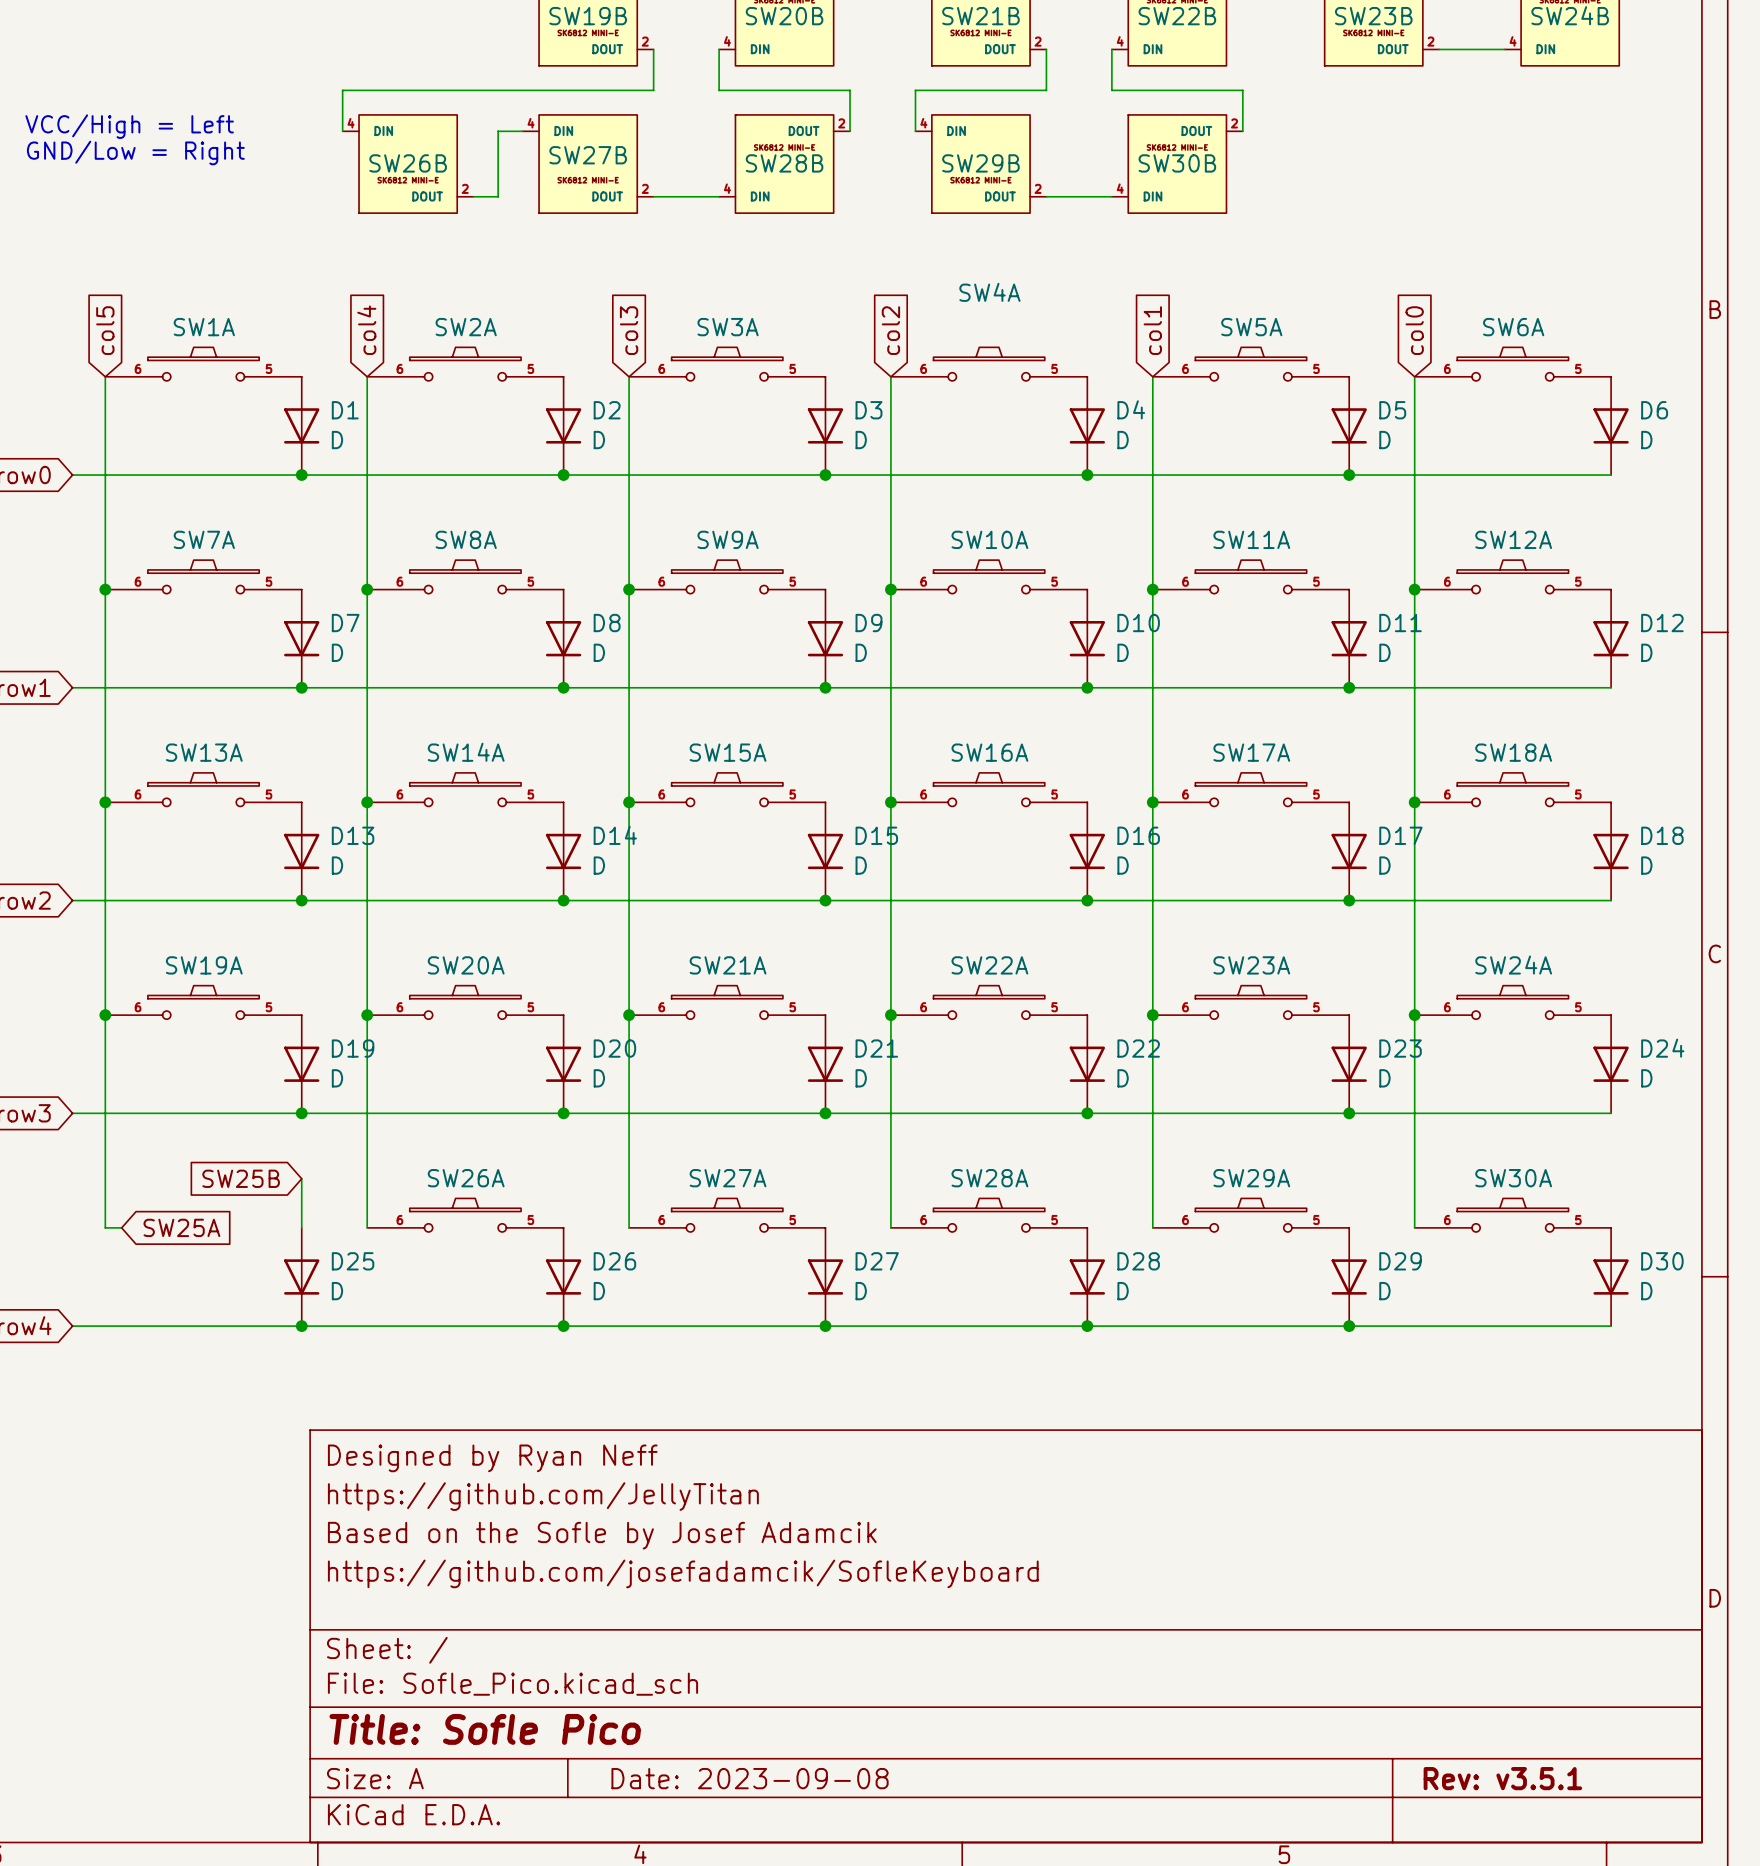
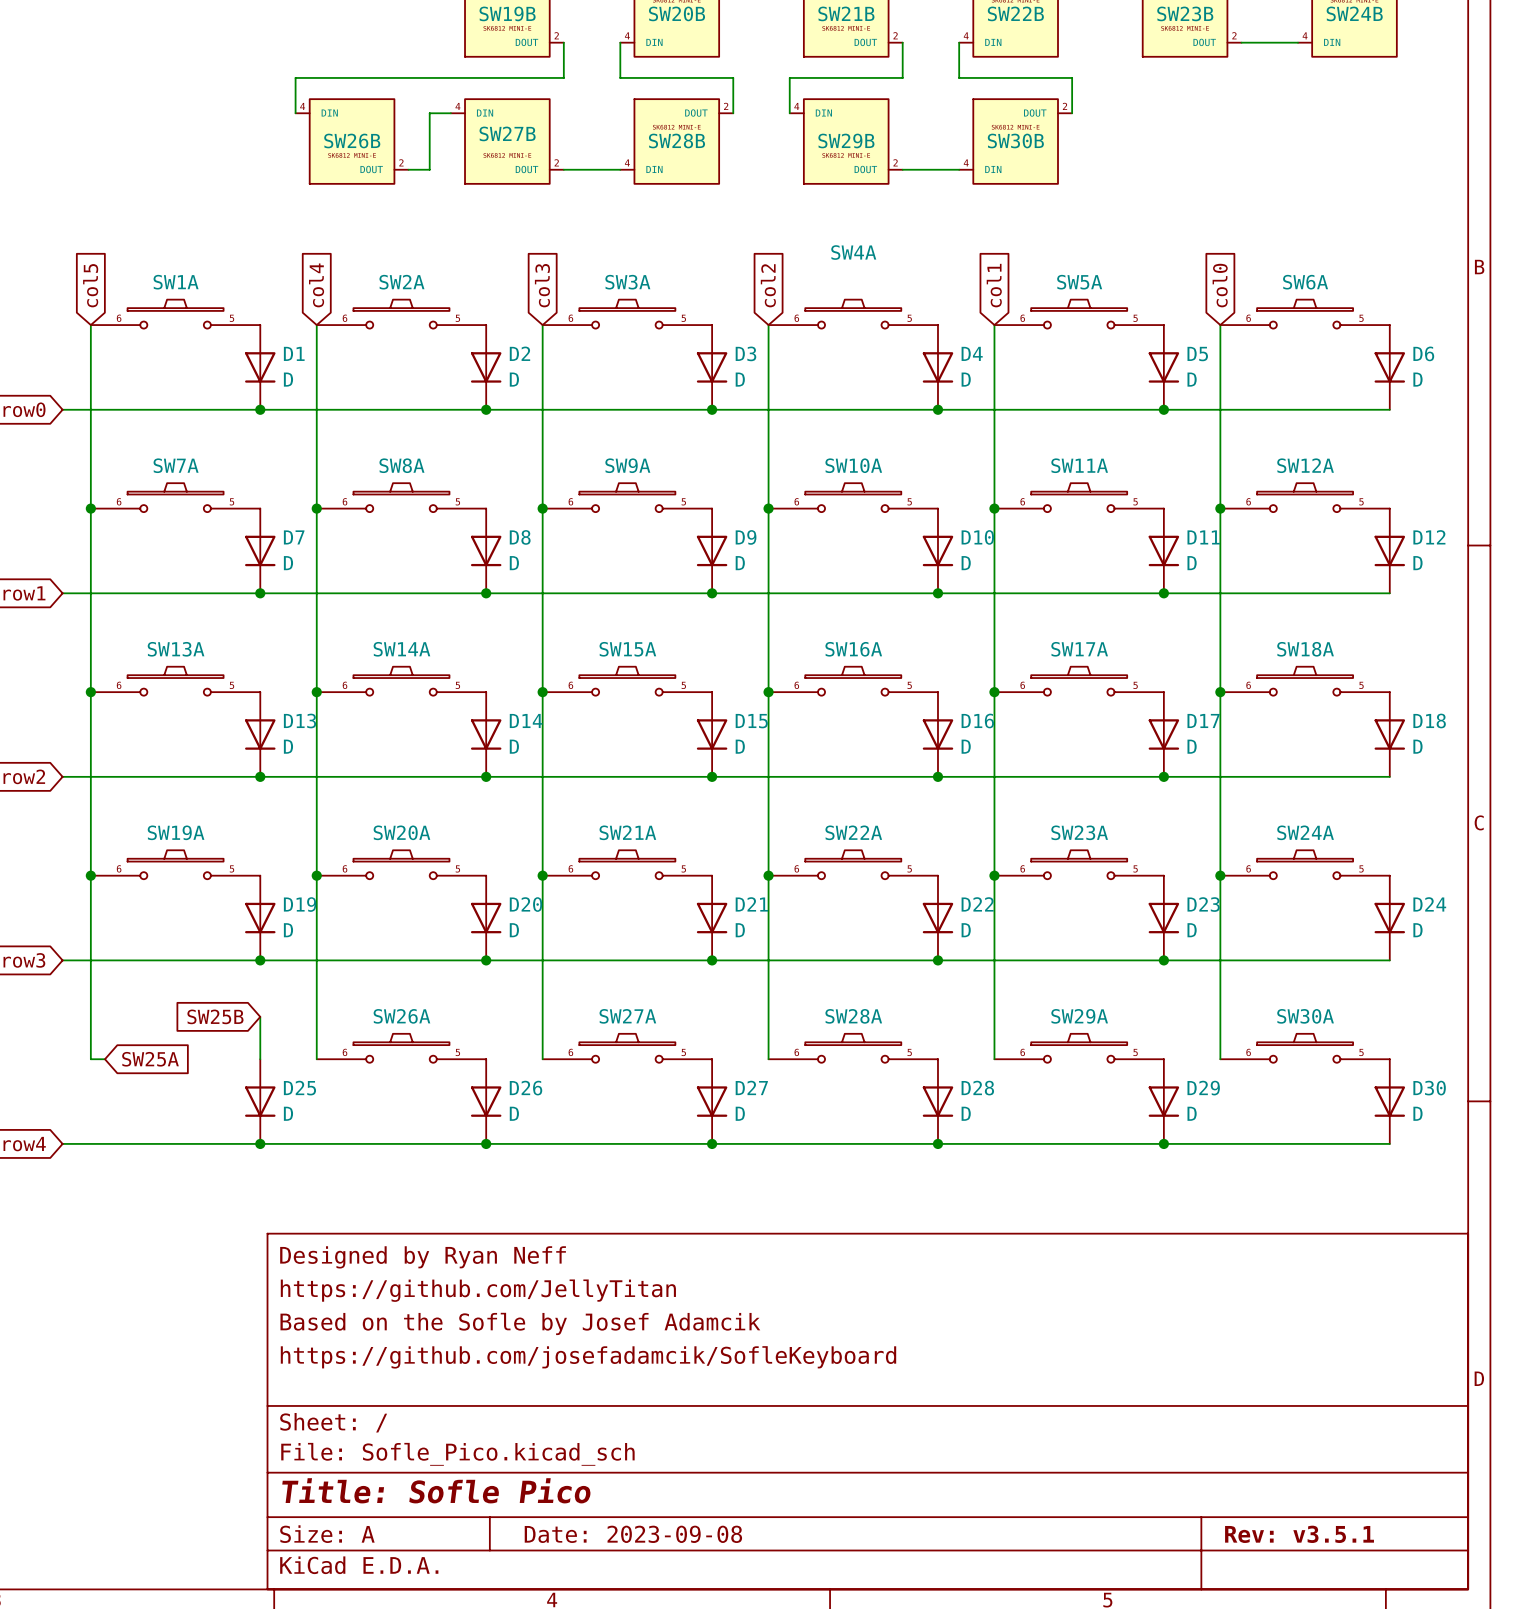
text: VCC/High = Left (129, 126) -> none
text: GND/Low = Right (135, 152) -> none

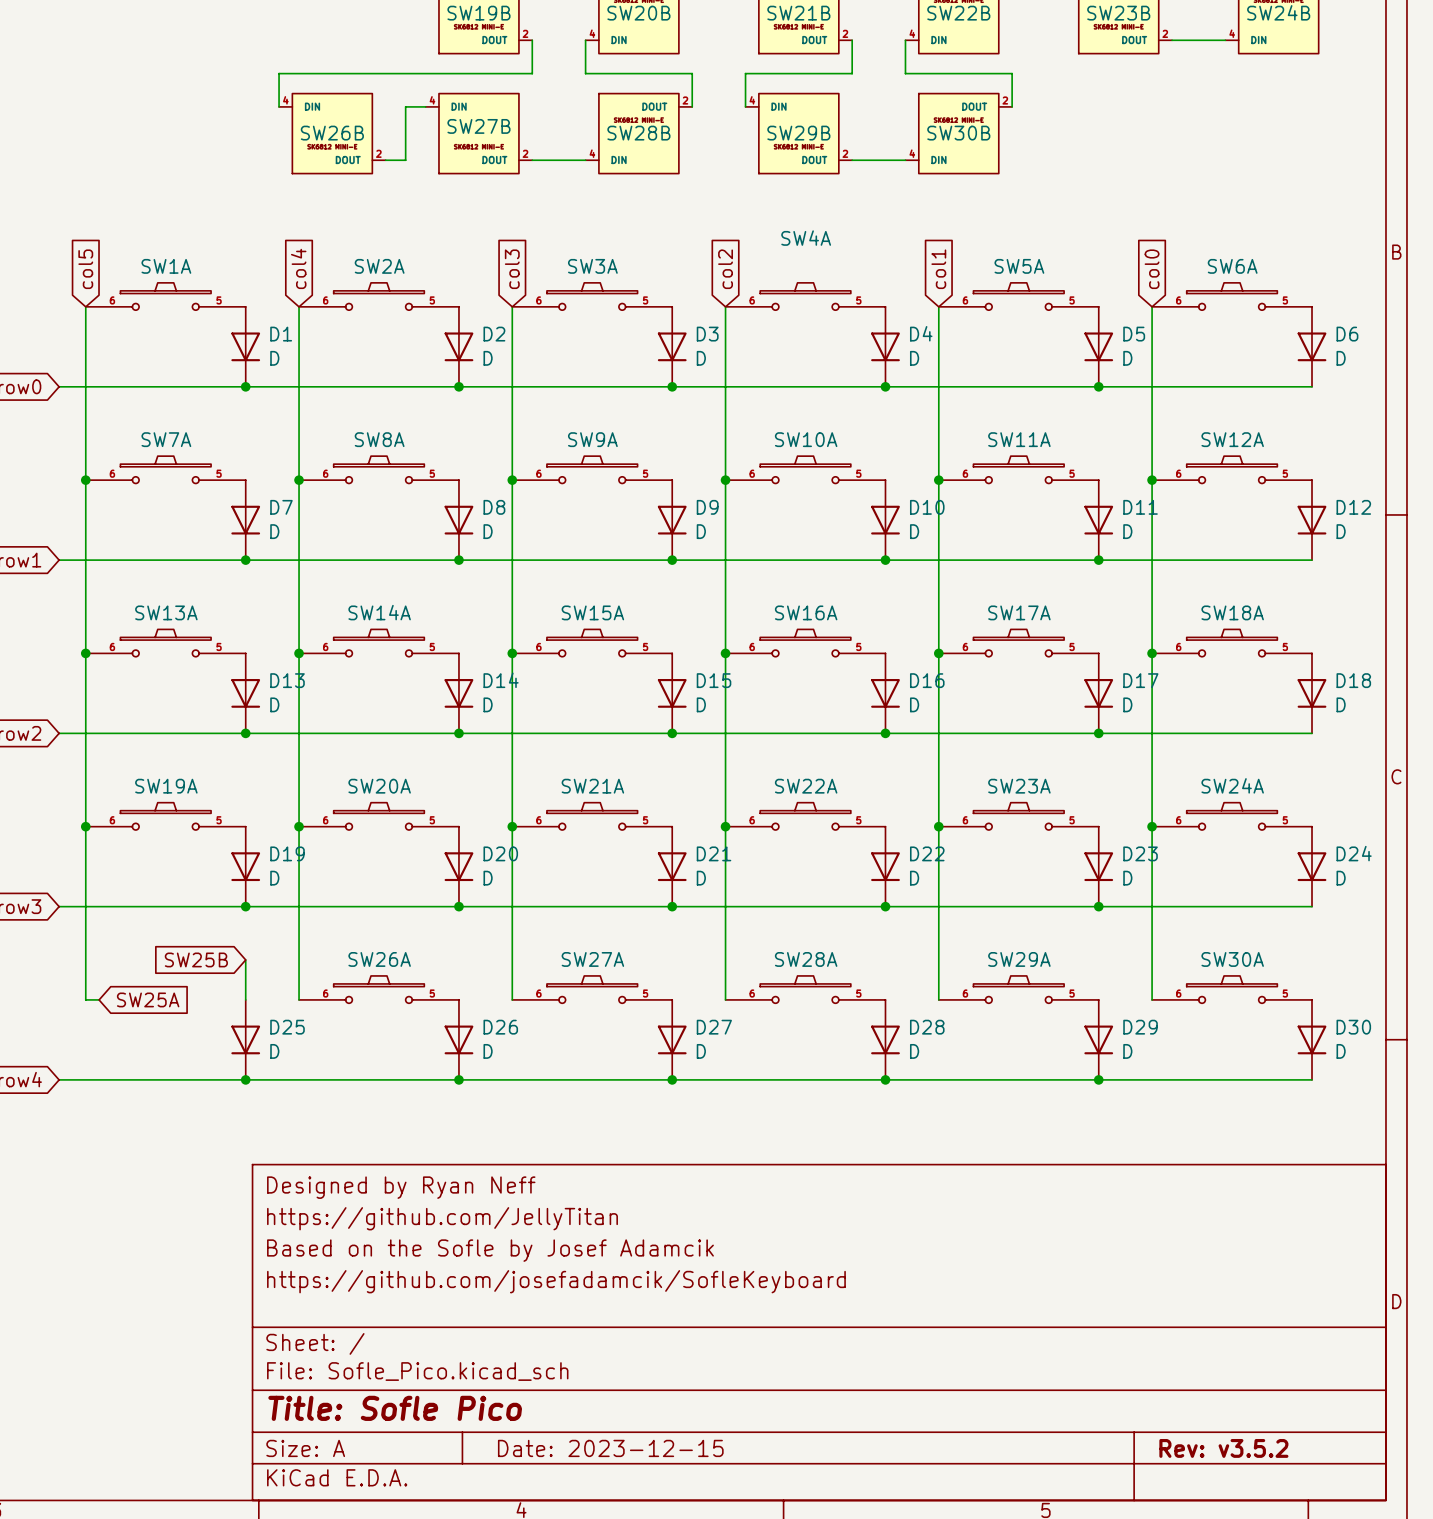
title block: Date: 2023-09-08 (633, 1534) -> Date: 2023-12-15 (610, 1448)
title block: Rev: v3.5.1 (1299, 1534) -> Rev: v3.5.2 (1223, 1448)

